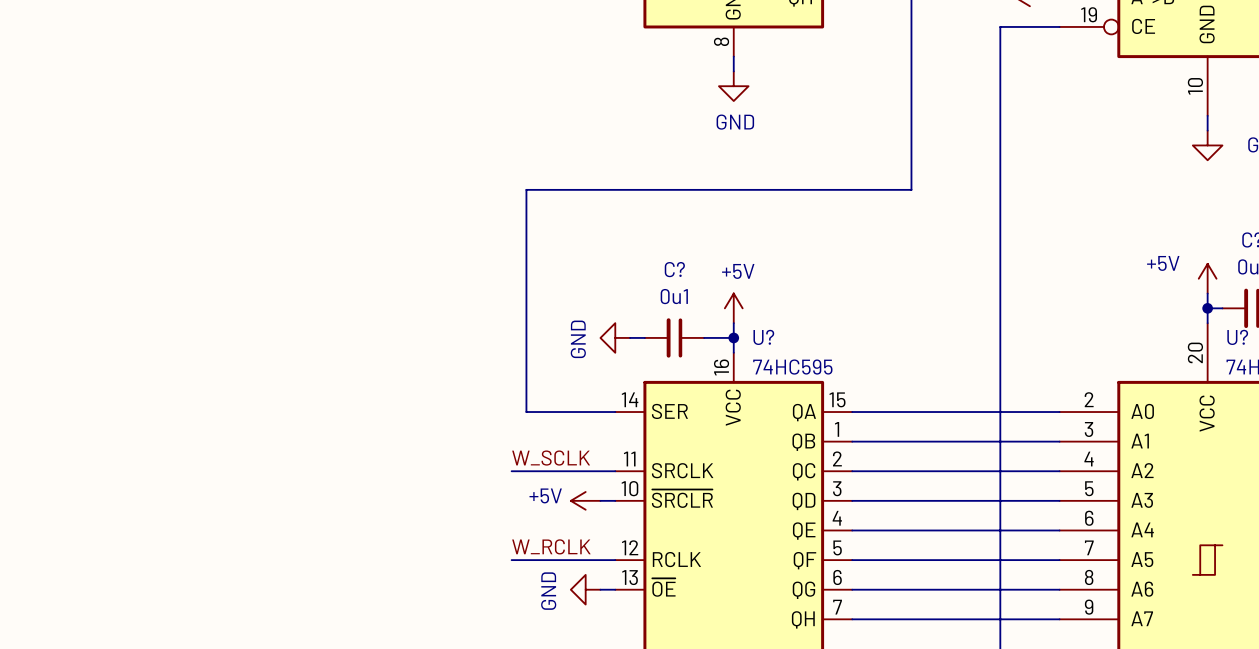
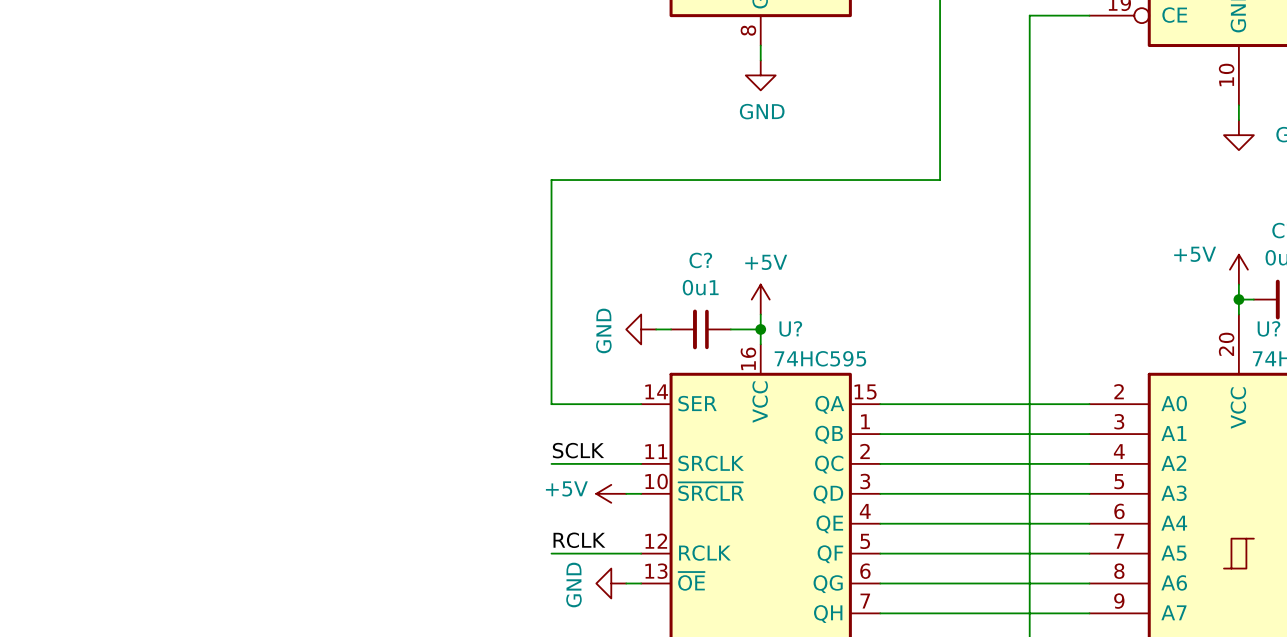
label: W_SCLK (551, 458) -> SCLK (578, 450)
wire: (511, 471) (526, 471) -> none
label: W_RCLK (551, 546) -> RCLK (579, 540)
wire: (511, 560) (526, 560) -> none

